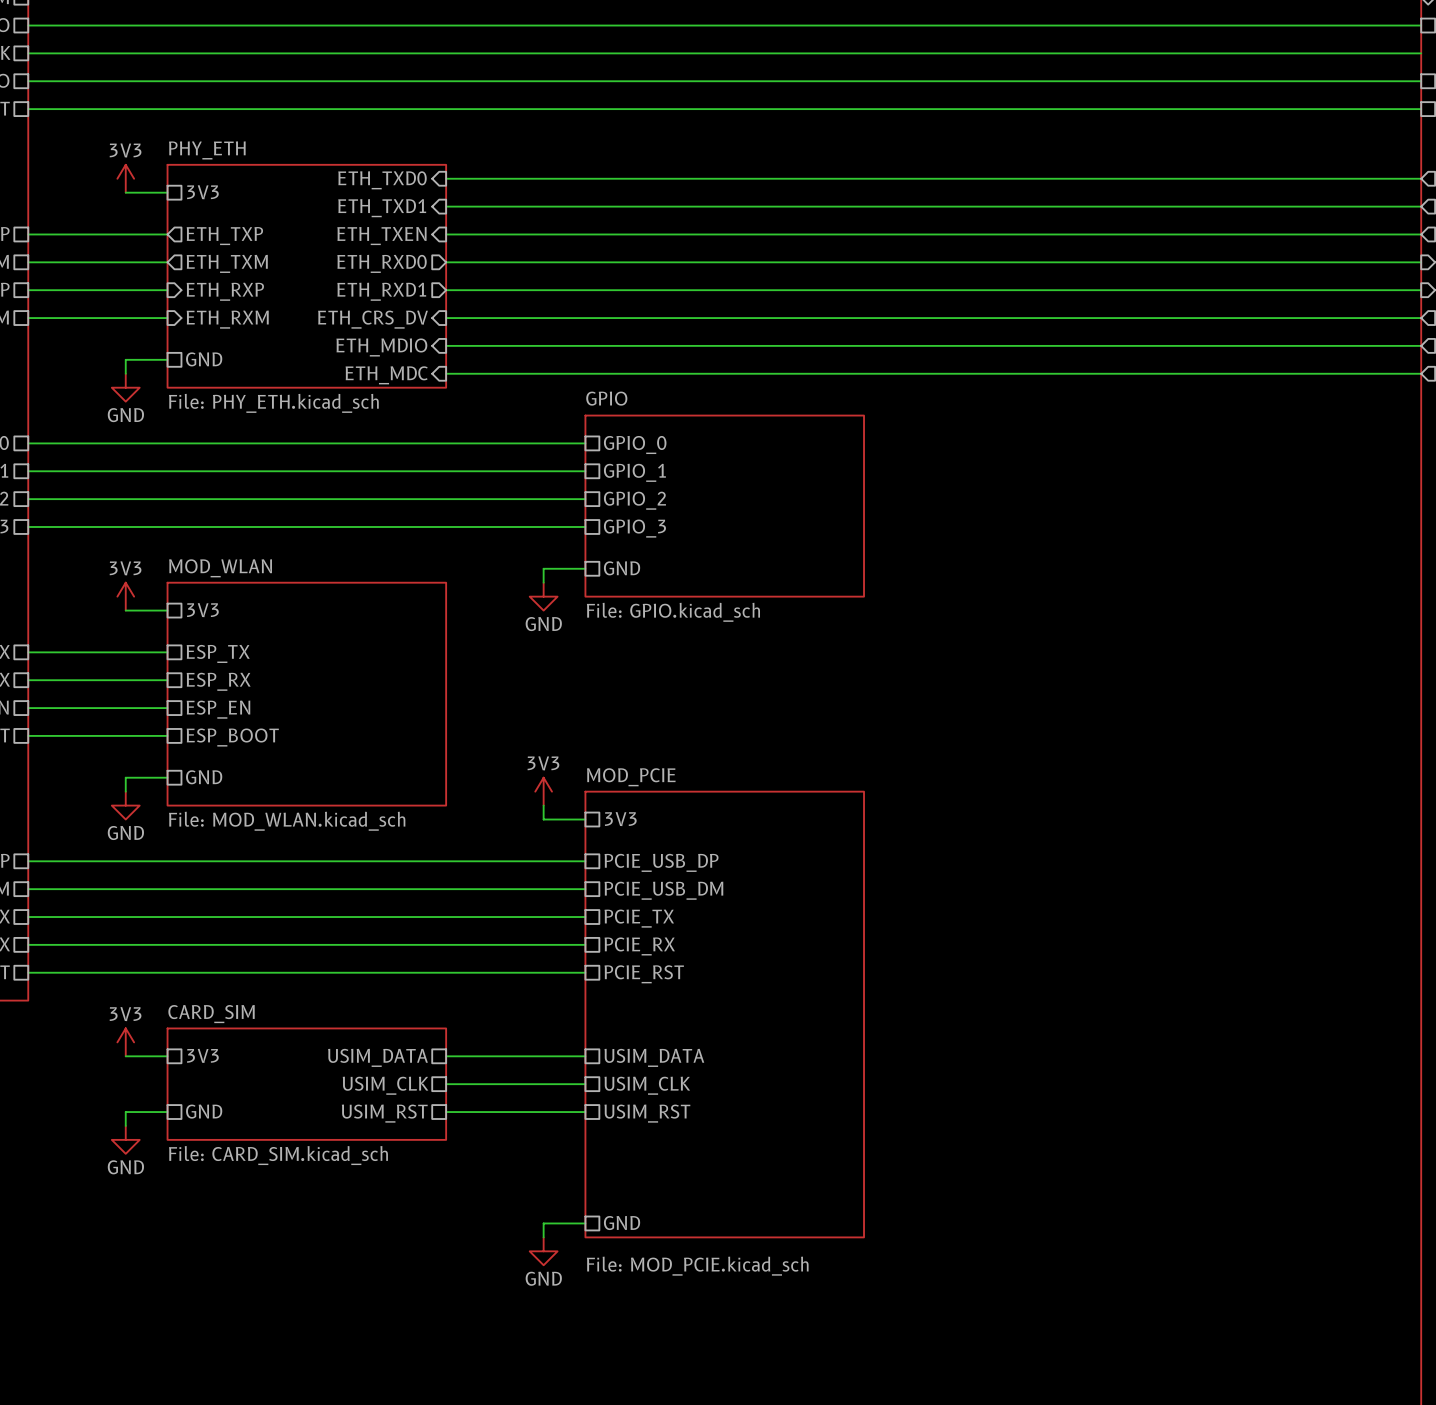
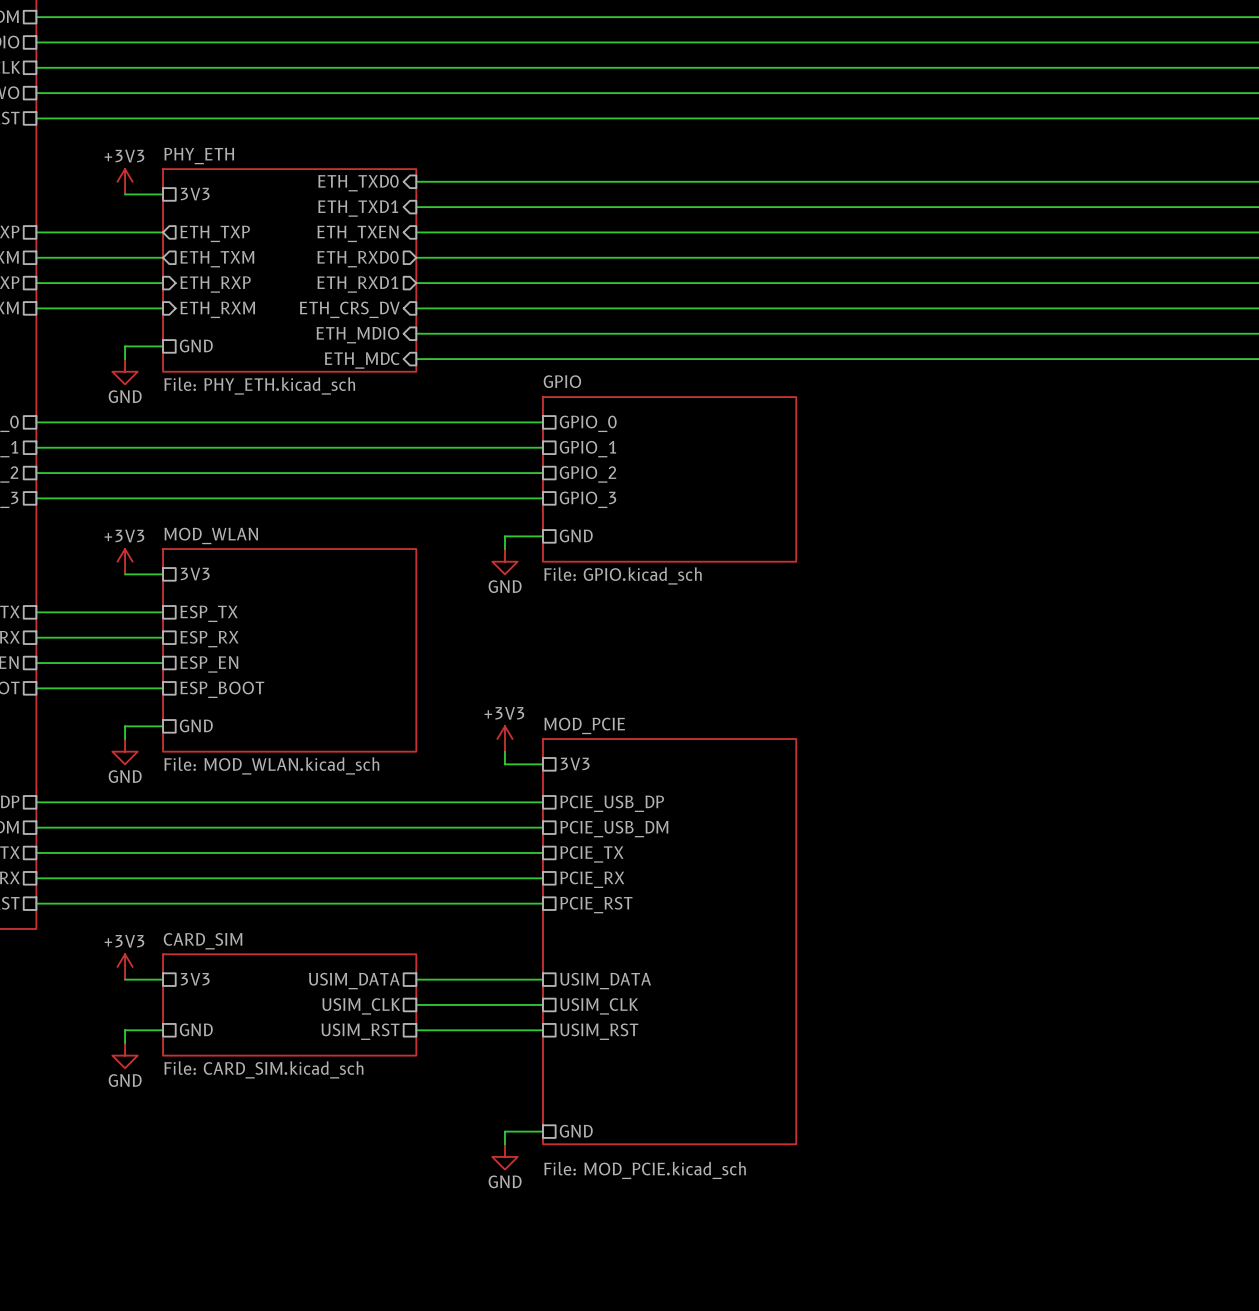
power symbol: 3V3 (125, 178) -> +3V3 (125, 181)
power symbol: 3V3 (125, 596) -> +3V3 (125, 561)
power symbol: 3V3 (543, 791) -> +3V3 (504, 739)
power symbol: 3V3 (125, 1042) -> +3V3 (125, 966)

